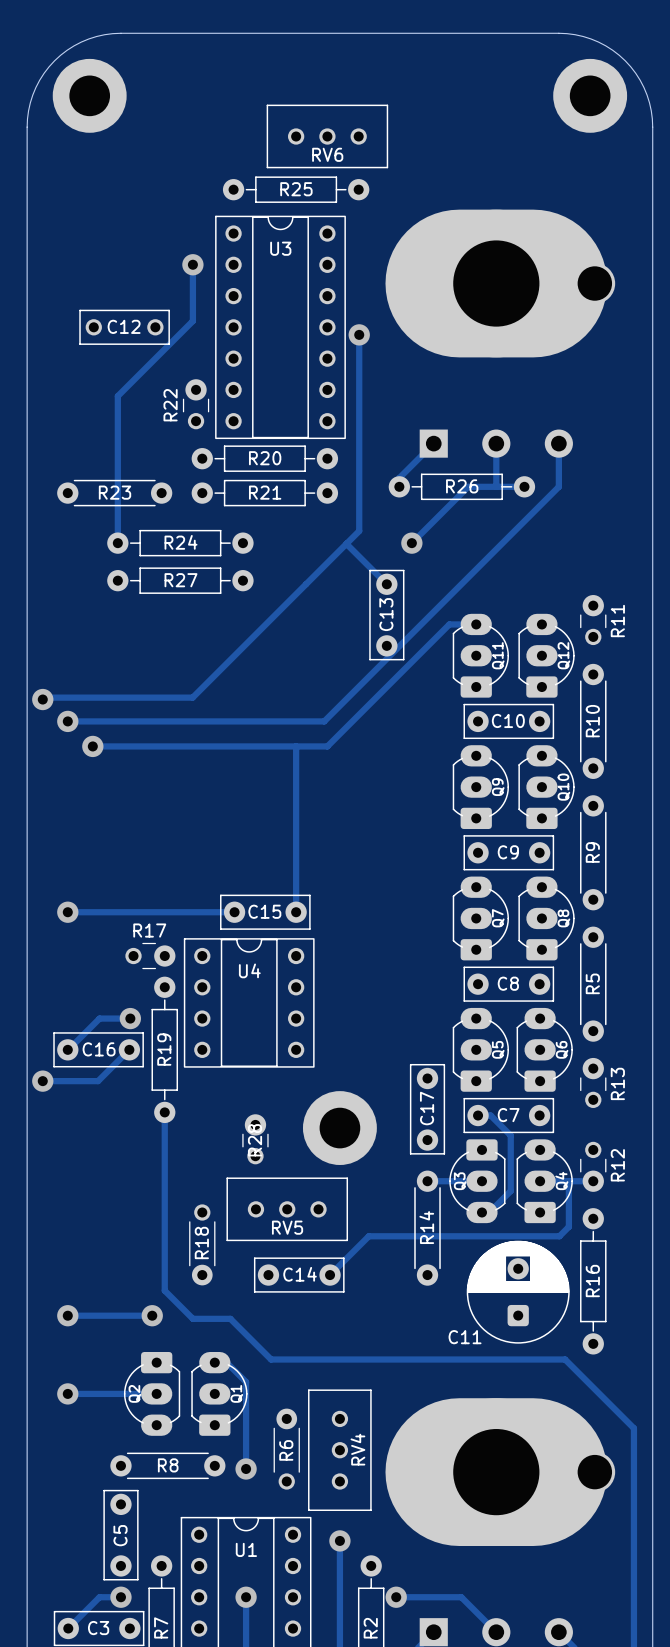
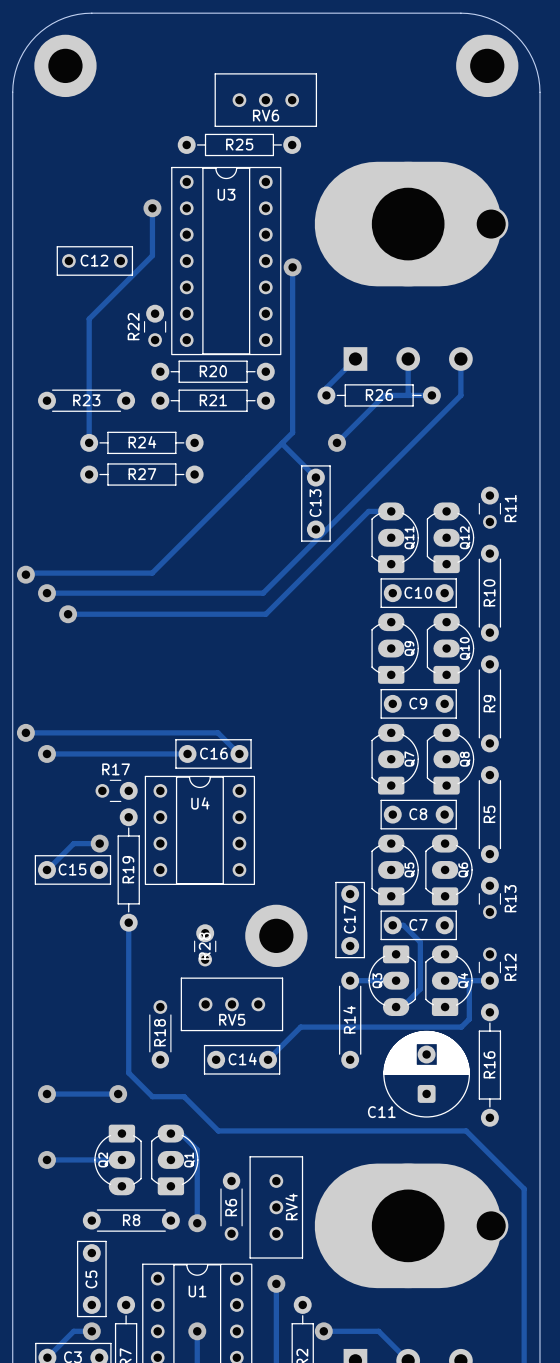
track: (296, 746) (296, 912) -> (25, 732) (217, 732) (239, 753)
via: none -> (25, 732)
C15 name: C15 (264, 911) -> C16 (213, 753)
C16 name: C16 (99, 1049) -> C15 (72, 869)
track: (129, 1049) (98, 1081) (42, 1081) -> none
via: (42, 1081) -> none

